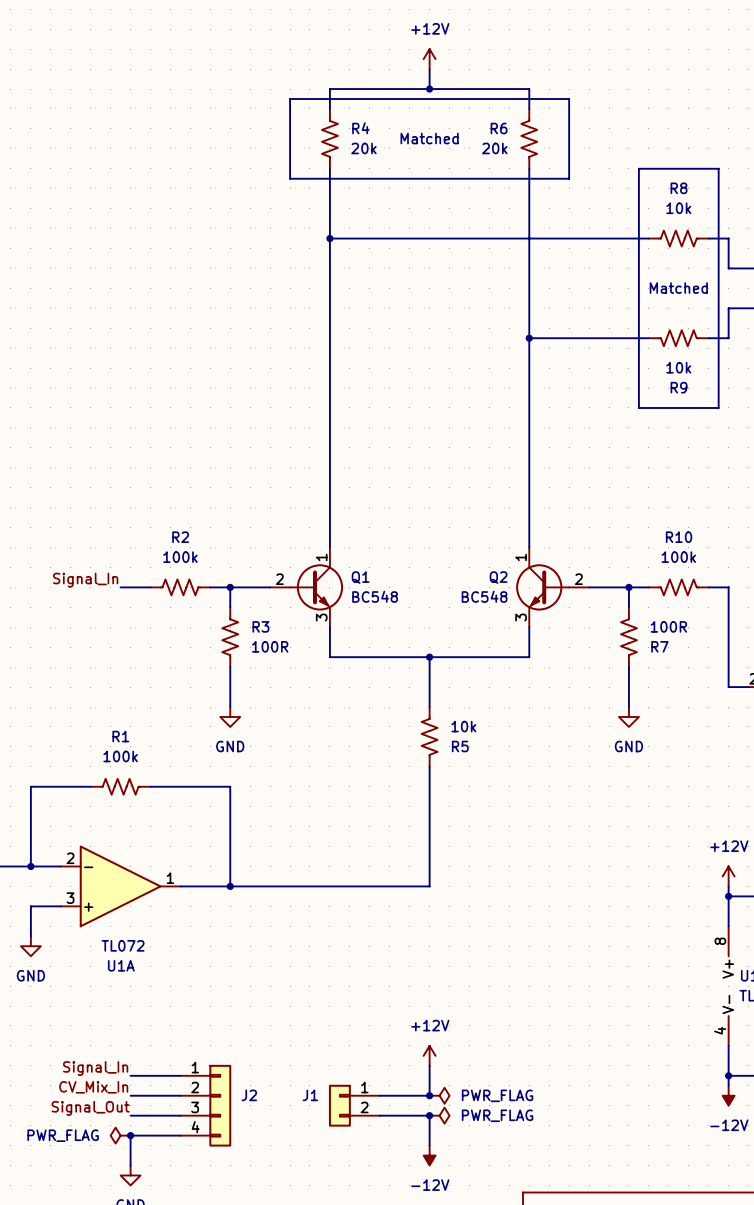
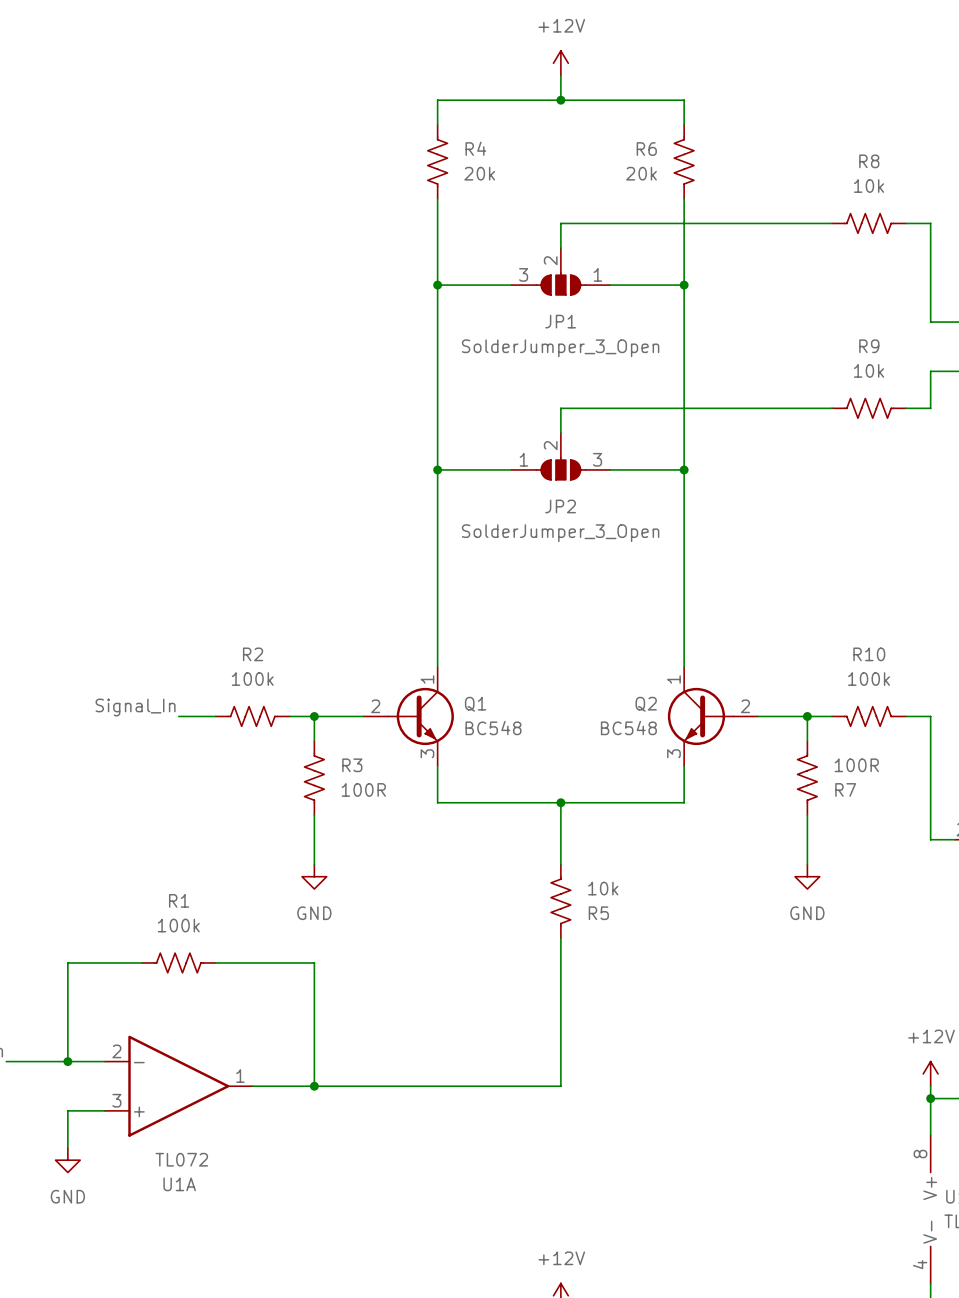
line: (290, 99) (569, 99) (569, 178) (290, 178) (290, 99) -> none
text: Matched (429, 138) -> none
line: (638, 168) (718, 168) (718, 407) (638, 407) (638, 168) -> none
wire: none -> (832, 223) (560, 223) (560, 248)
JP1: none -> SolderJumper_3_Open (560, 271)
wire: (529, 238) (648, 238) -> none
junction: none -> (684, 285)
R8 position: (678, 238) -> (869, 223)
wire: (708, 238) (728, 238) -> (905, 223) (930, 223) (930, 285)
text: Matched (678, 288) -> none
wire: none -> (684, 408) (560, 408) (560, 432)
junction: (529, 338) -> none
R9 flip: as is (678, 338) -> left-right (869, 408)
R9 value position: 10k (678, 367) -> 10k (869, 370)
JP2: none -> SolderJumper_3_Open (560, 456)
R9 name position: R9 (679, 387) -> R9 (869, 346)
wire: none -> (437, 469) (511, 469)
junction: none -> (437, 469)
wire: none -> (610, 469) (684, 469)
junction: none -> (684, 469)

